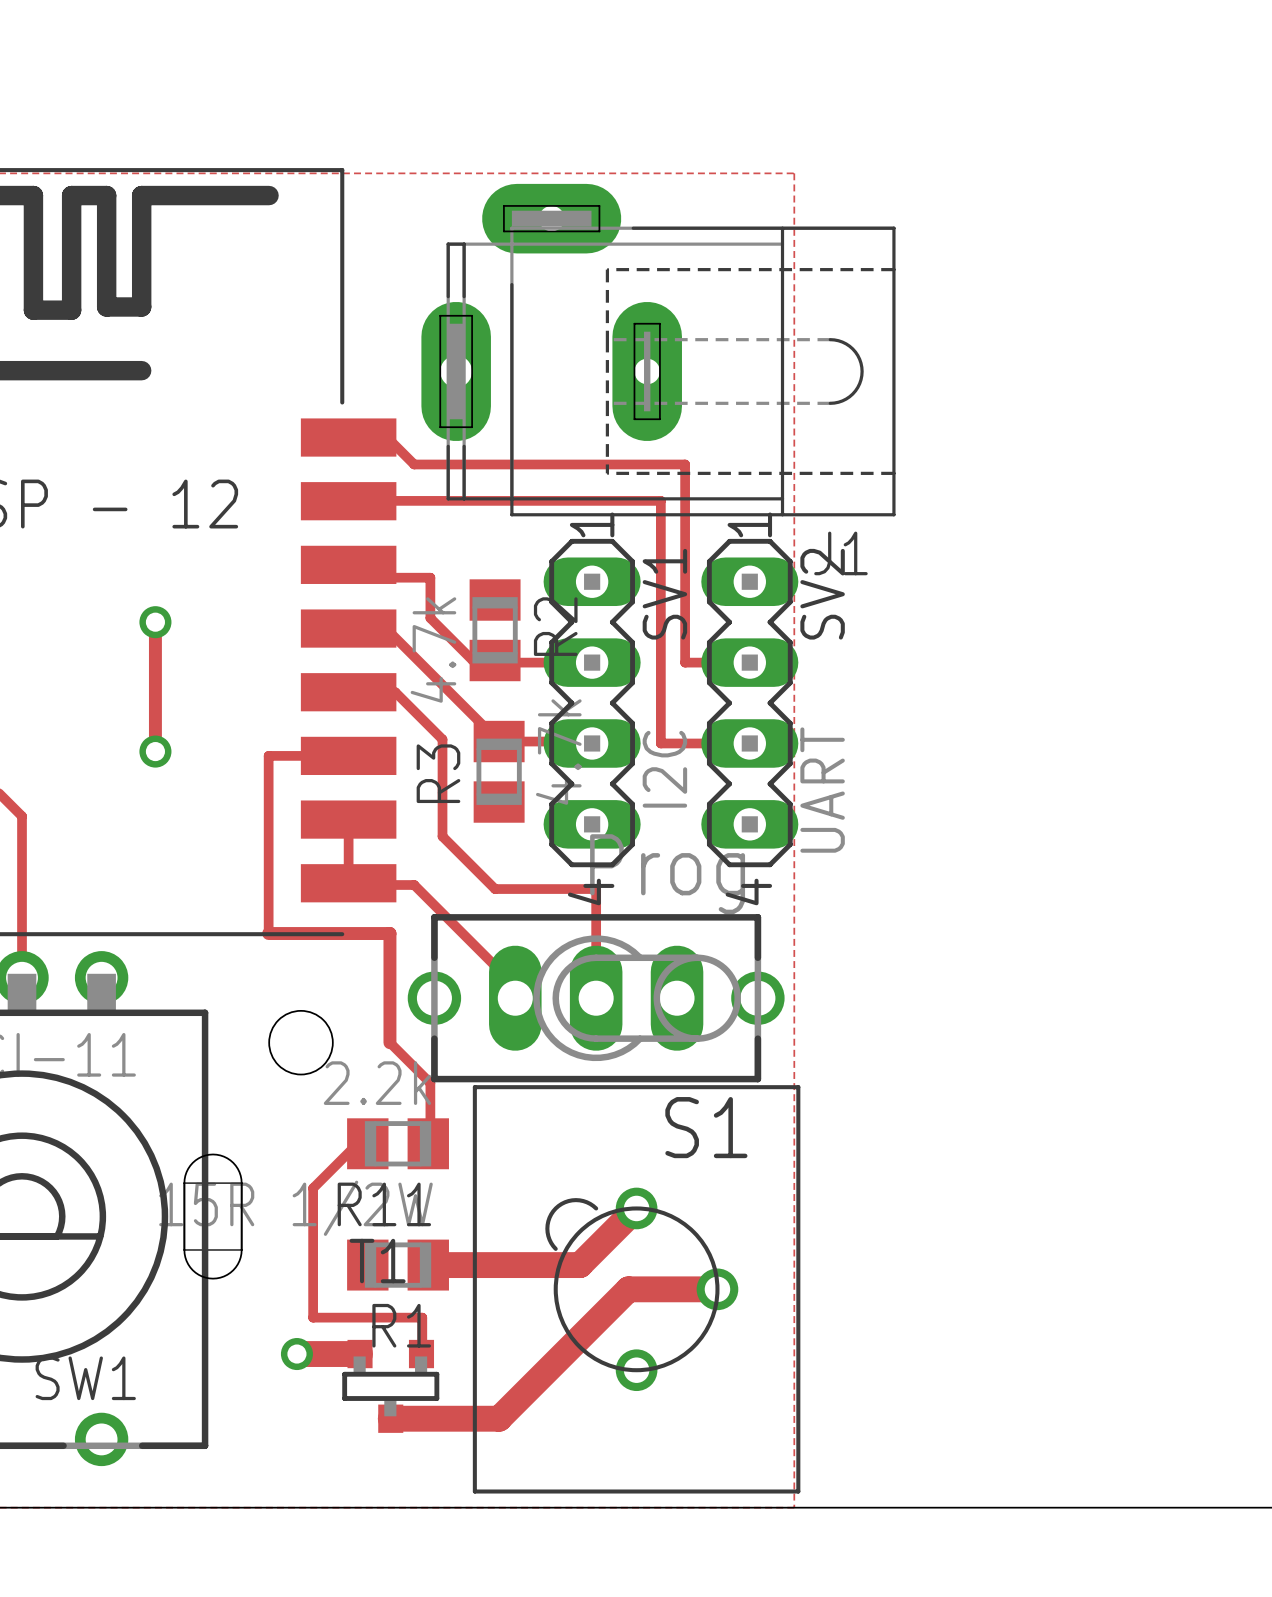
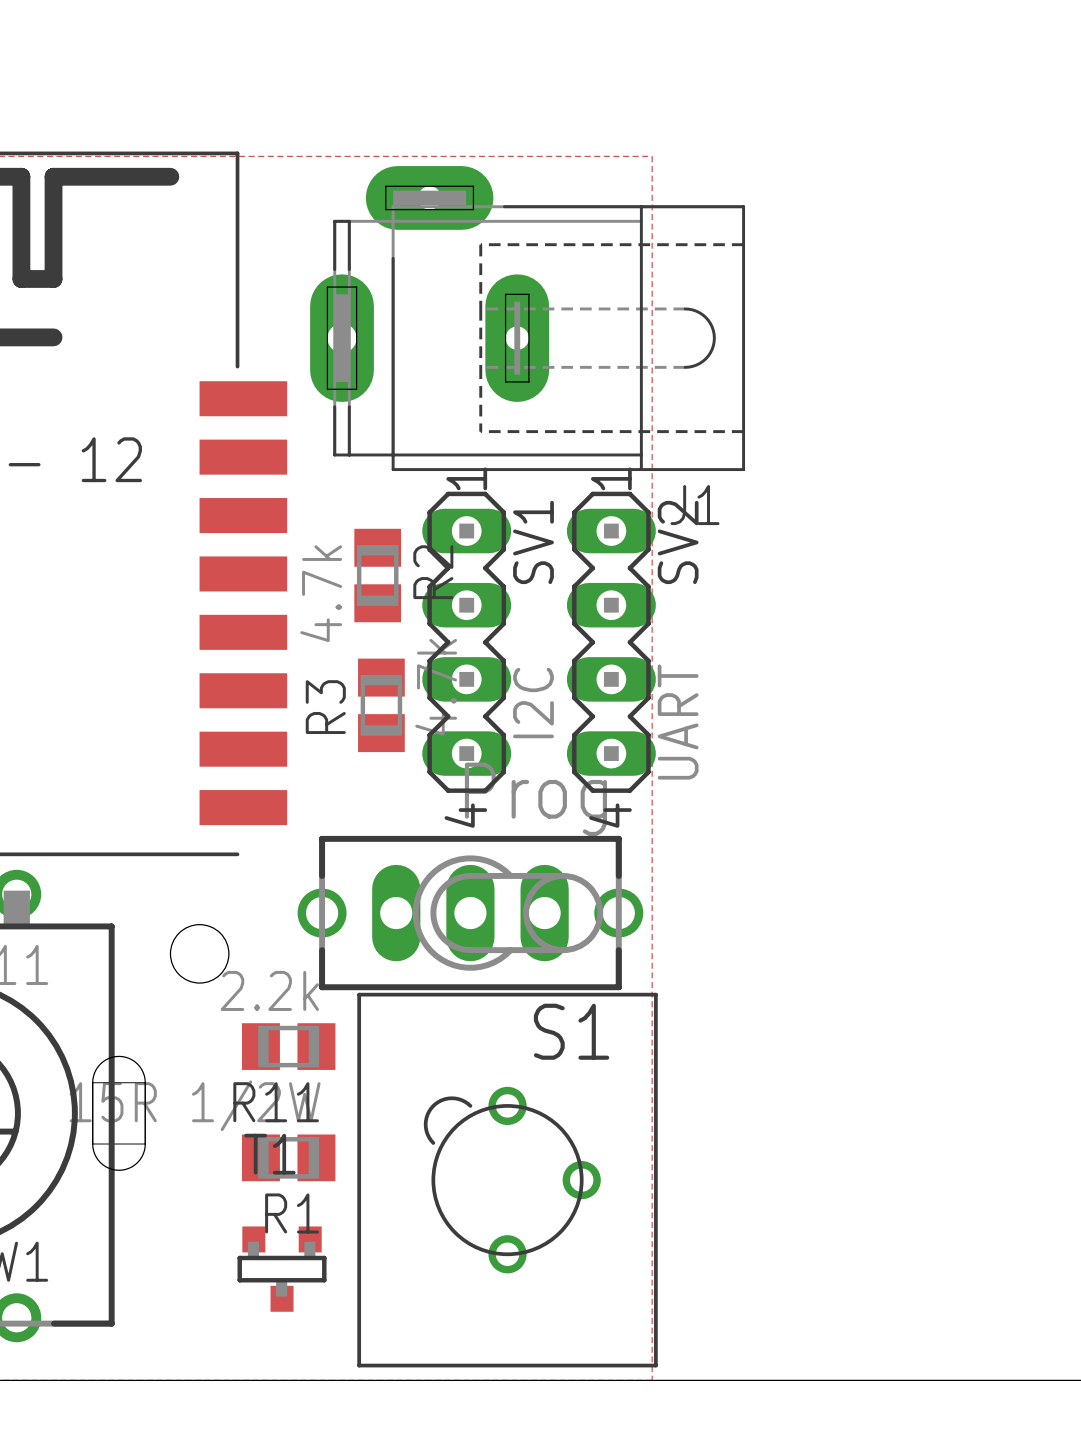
track: (348, 437) (351, 440) (389, 440) (414, 464) (685, 464) (685, 662) (749, 662) -> none
track: (348, 500) (660, 500) (660, 743) (749, 743) -> none
track: (348, 564) (361, 577) (430, 577) (430, 618) (472, 660) (495, 660) (497, 662) (592, 662) -> none
track: (155, 622) (155, 751) -> none
via: (155, 622) -> none
track: (348, 628) (386, 628) (499, 741) (590, 741) (592, 743) -> none
track: (348, 692) (395, 692) (442, 739) (442, 836) (495, 889) (596, 889) (596, 998) -> none
via: (155, 751) -> none
track: (348, 755) (268, 755) (268, 933) (389, 933) (389, 1042) (430, 1083) (430, 1141) (428, 1143) -> none
track: (348, 819) (348, 883) (350, 885) (414, 885) (515, 986) (515, 998) -> none
track: (367, 1143) (357, 1143) (313, 1188) (313, 1317) (422, 1317) (421, 1354) -> none
track: (636, 1208) (579, 1265) (428, 1265) -> none
track: (717, 1289) (628, 1289) (499, 1418) (390, 1418) -> none
track: (296, 1354) (360, 1354) -> none
via: (296, 1354) -> none

